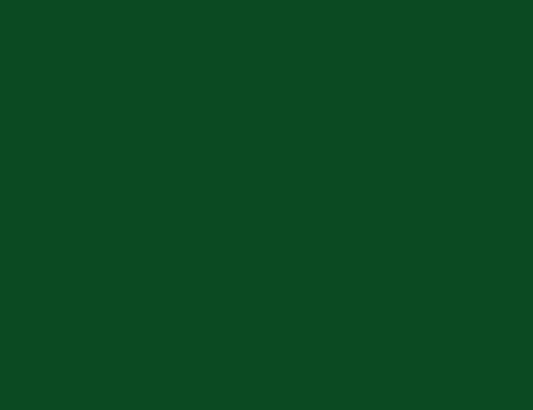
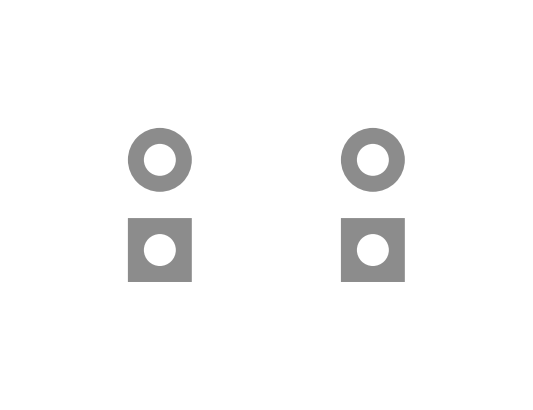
part: none -> (159, 204)
part: none -> (372, 204)

